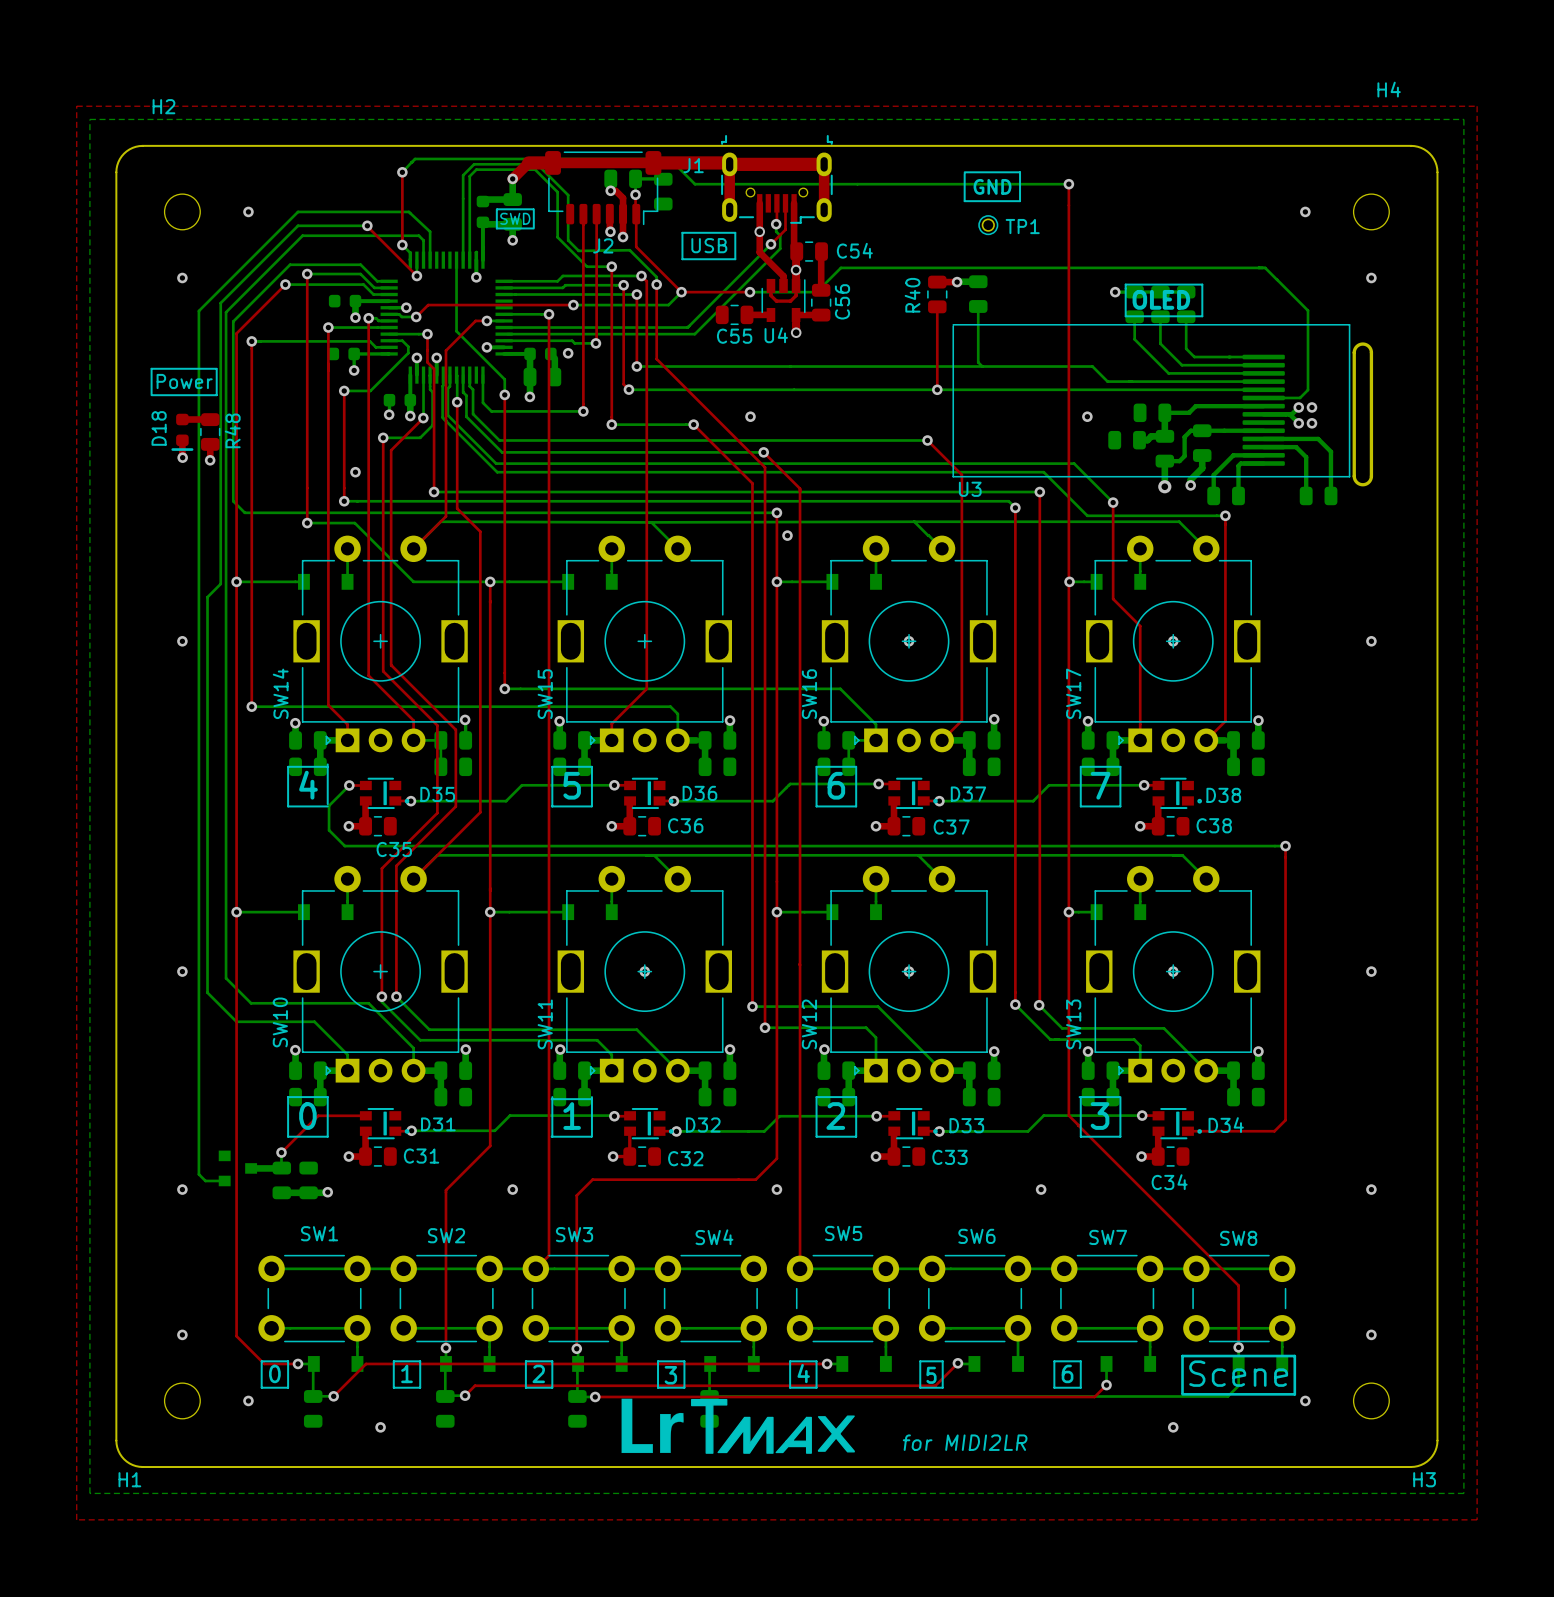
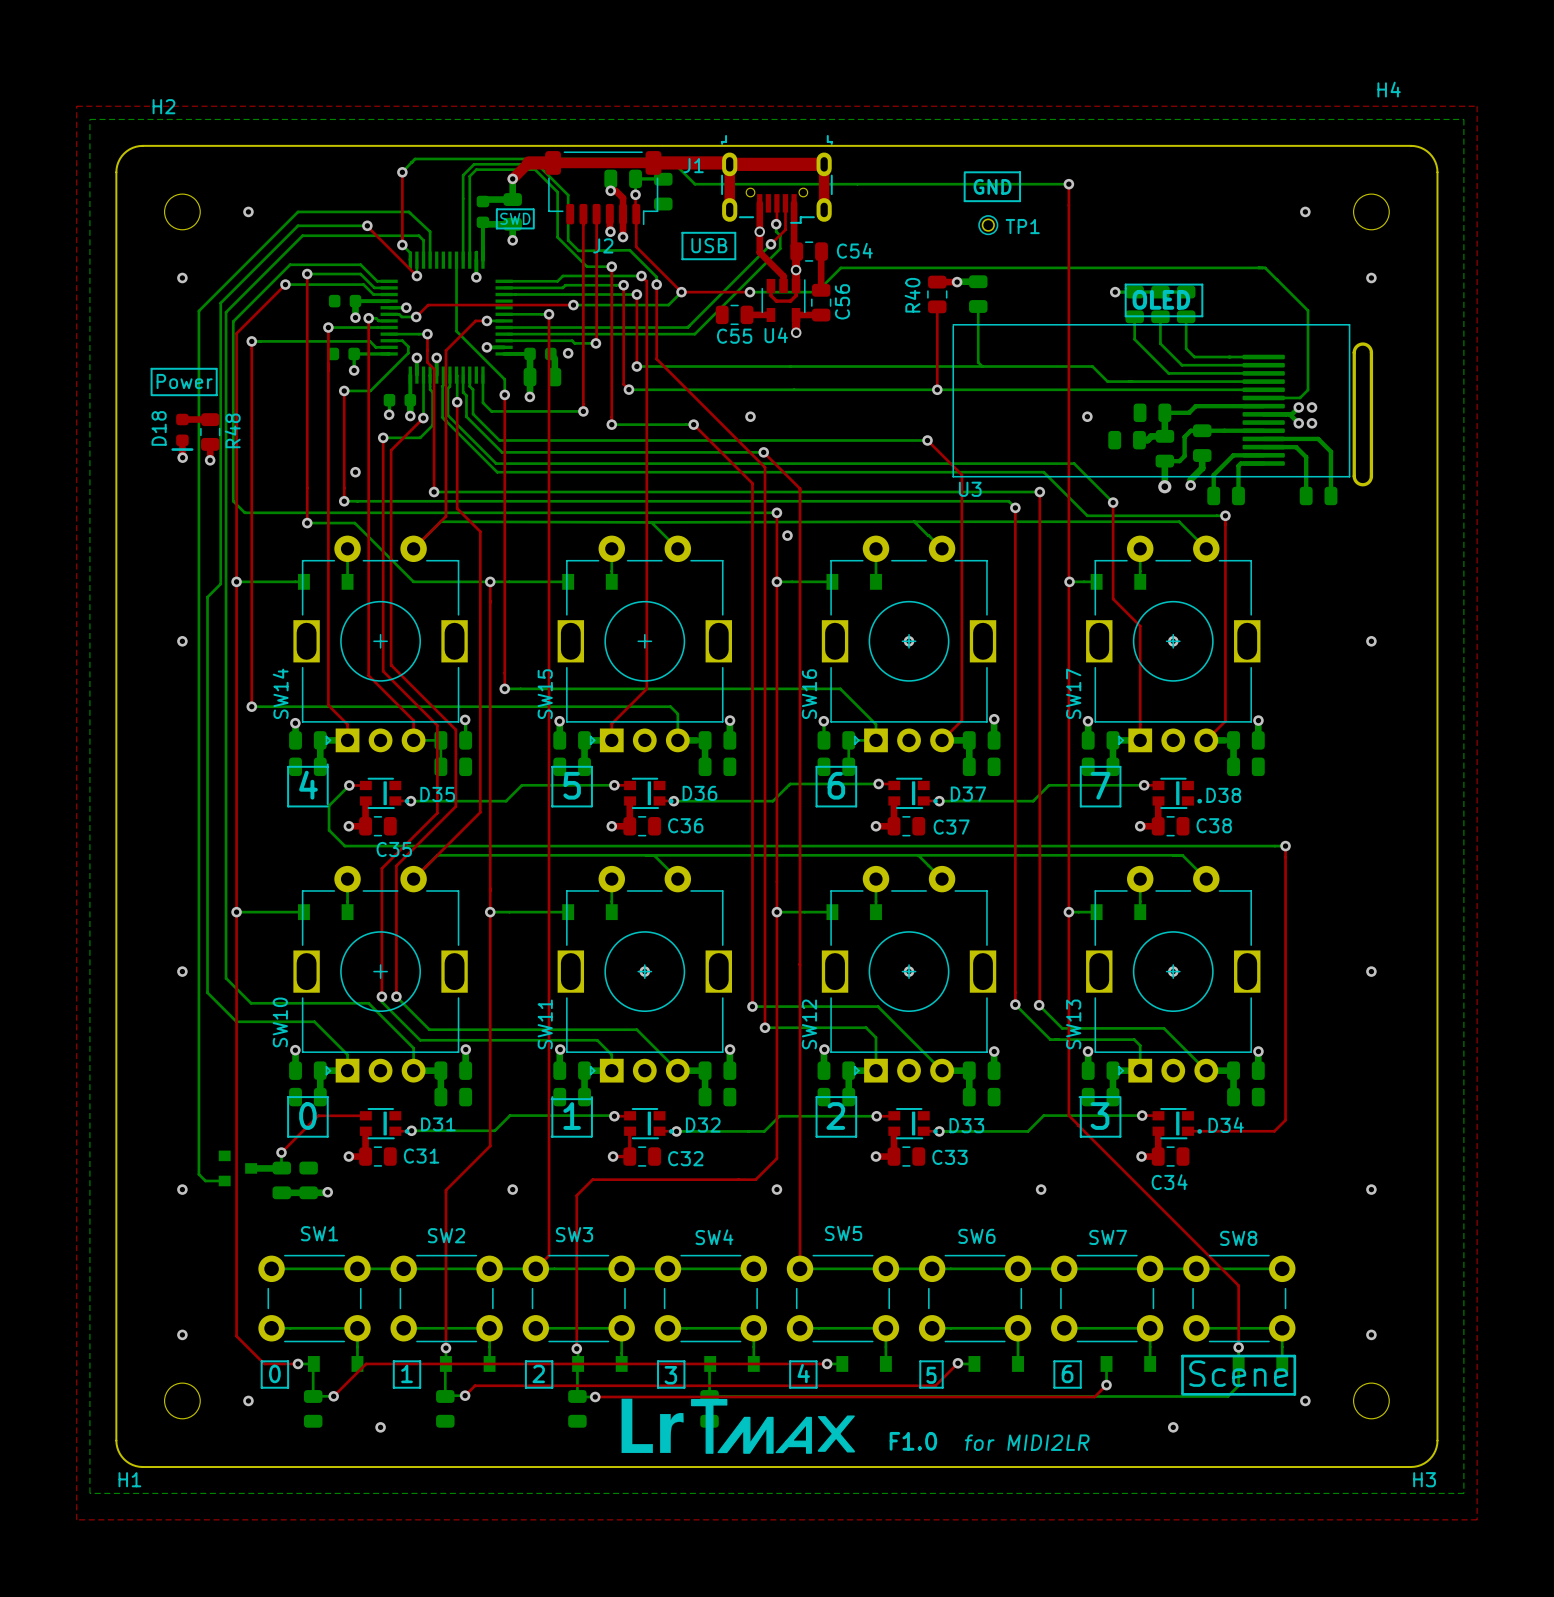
text: none -> F1.0 (913, 1441)
text position: for MIDI2LR (965, 1442) -> for MIDI2LR (1027, 1442)

